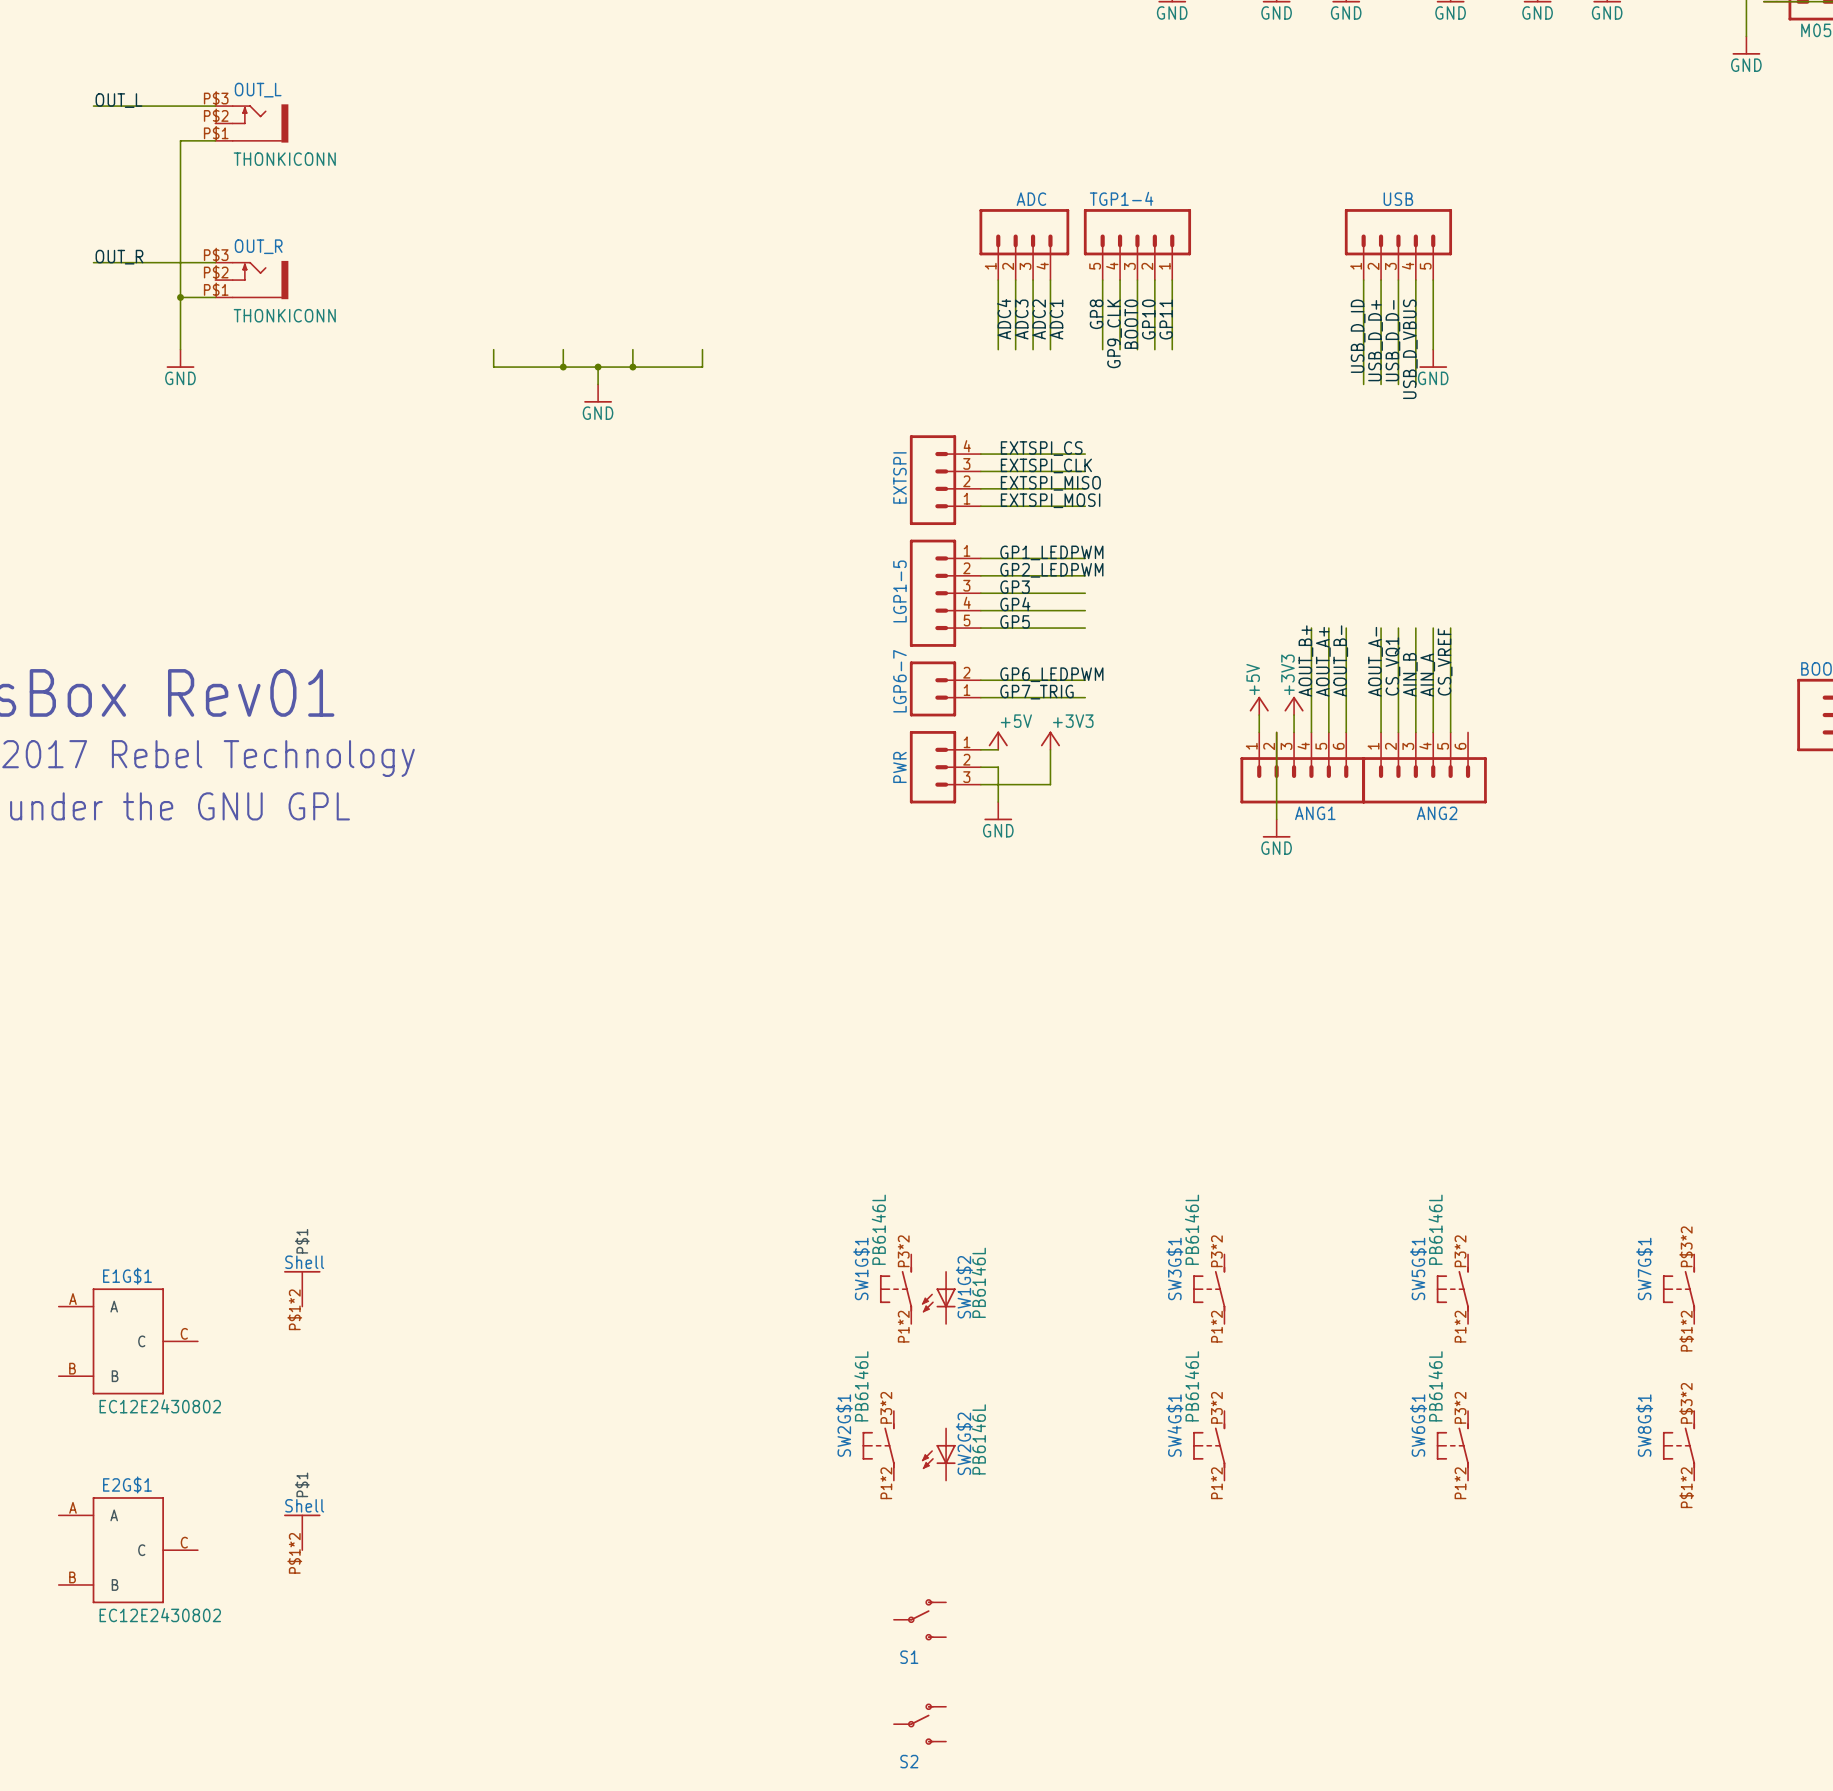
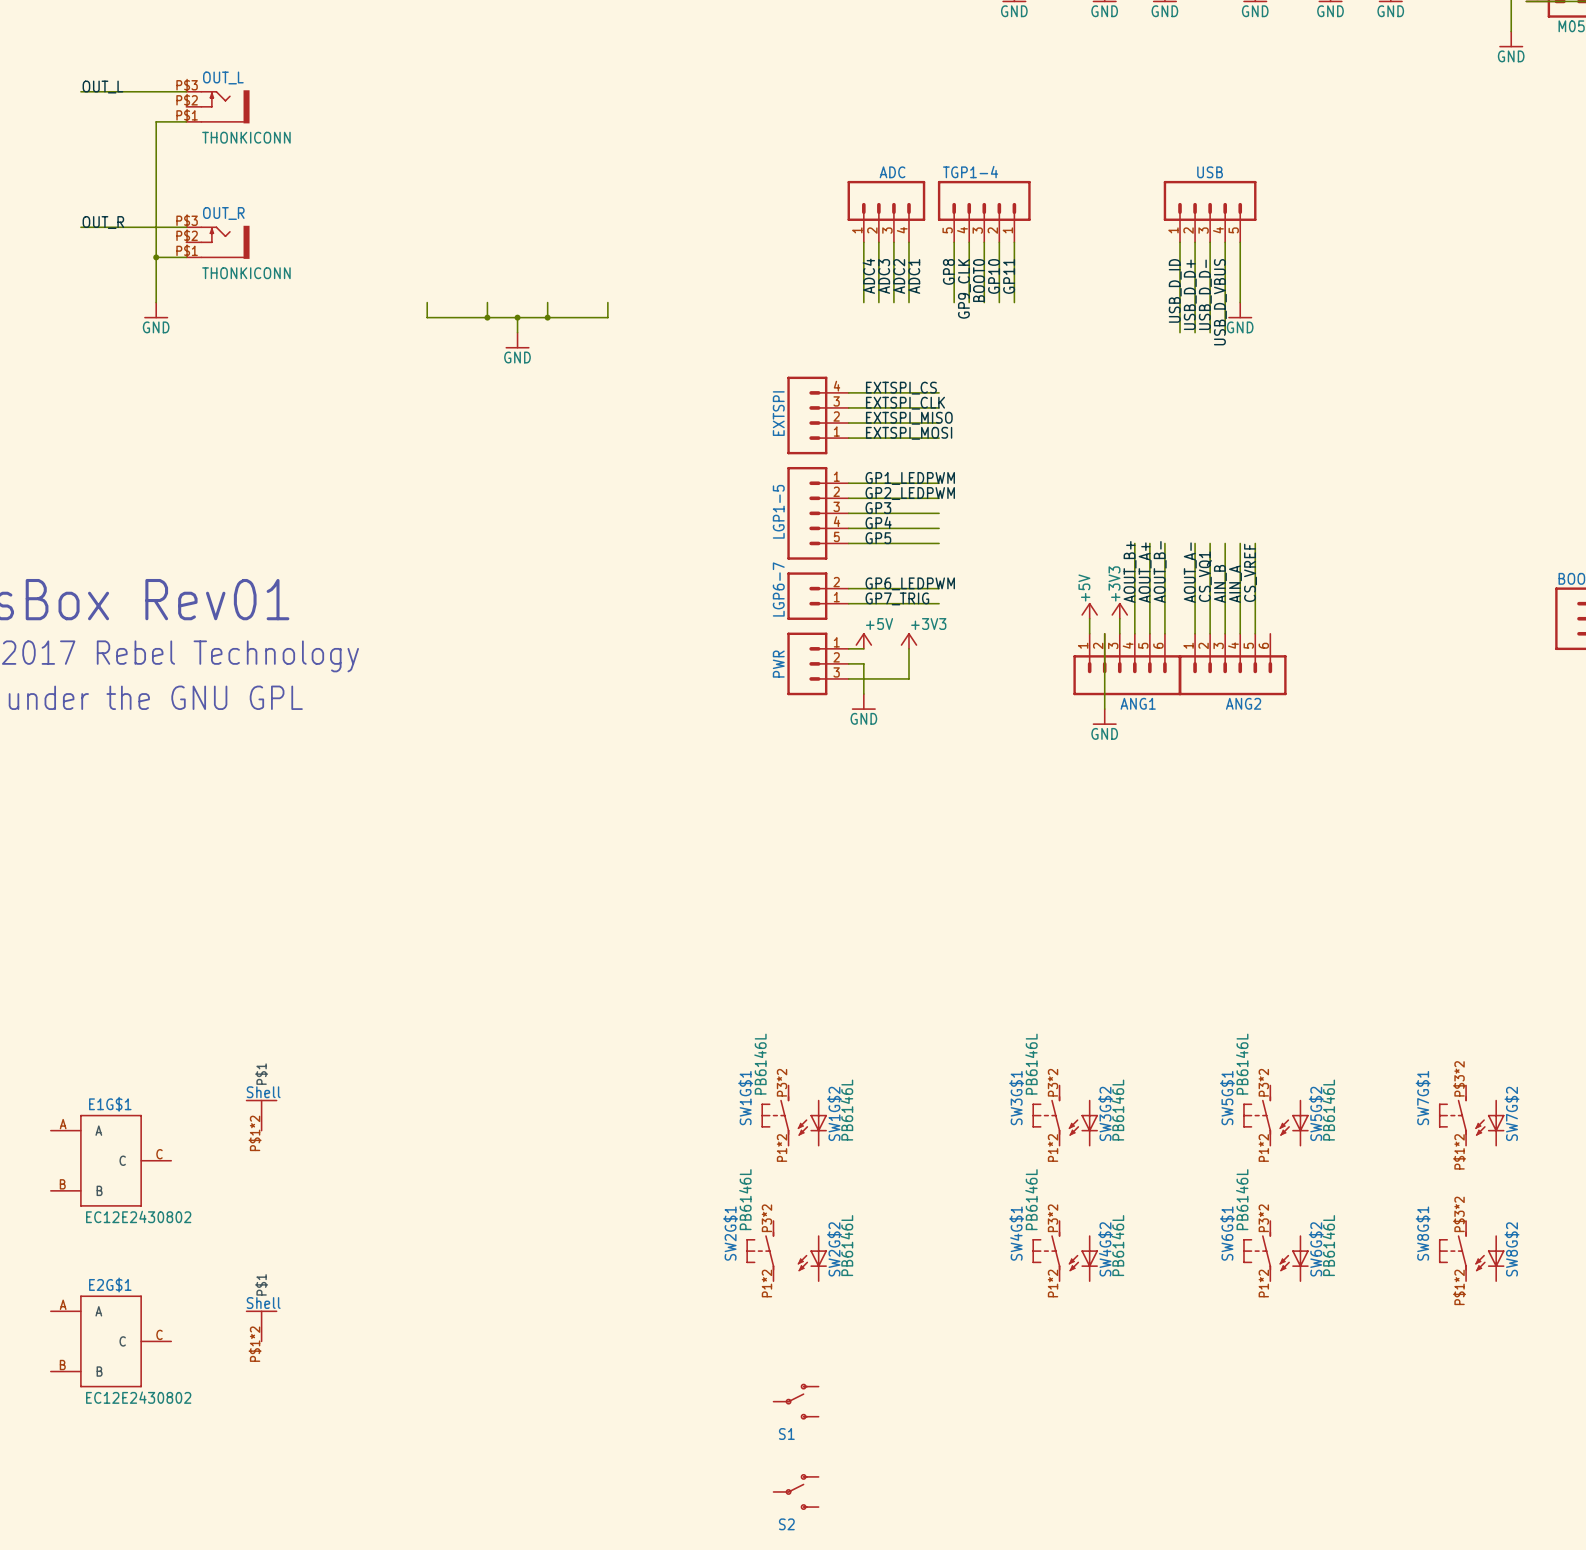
SW3G$2: none -> PB6146L (1083, 1123)
SW5G$2: none -> PB6146L (1294, 1123)
SW7G$2: none -> (1489, 1123)
SW4G$2: none -> PB6146L (1083, 1258)
SW6G$2: none -> PB6146L (1294, 1258)
SW8G$2: none -> (1489, 1258)

